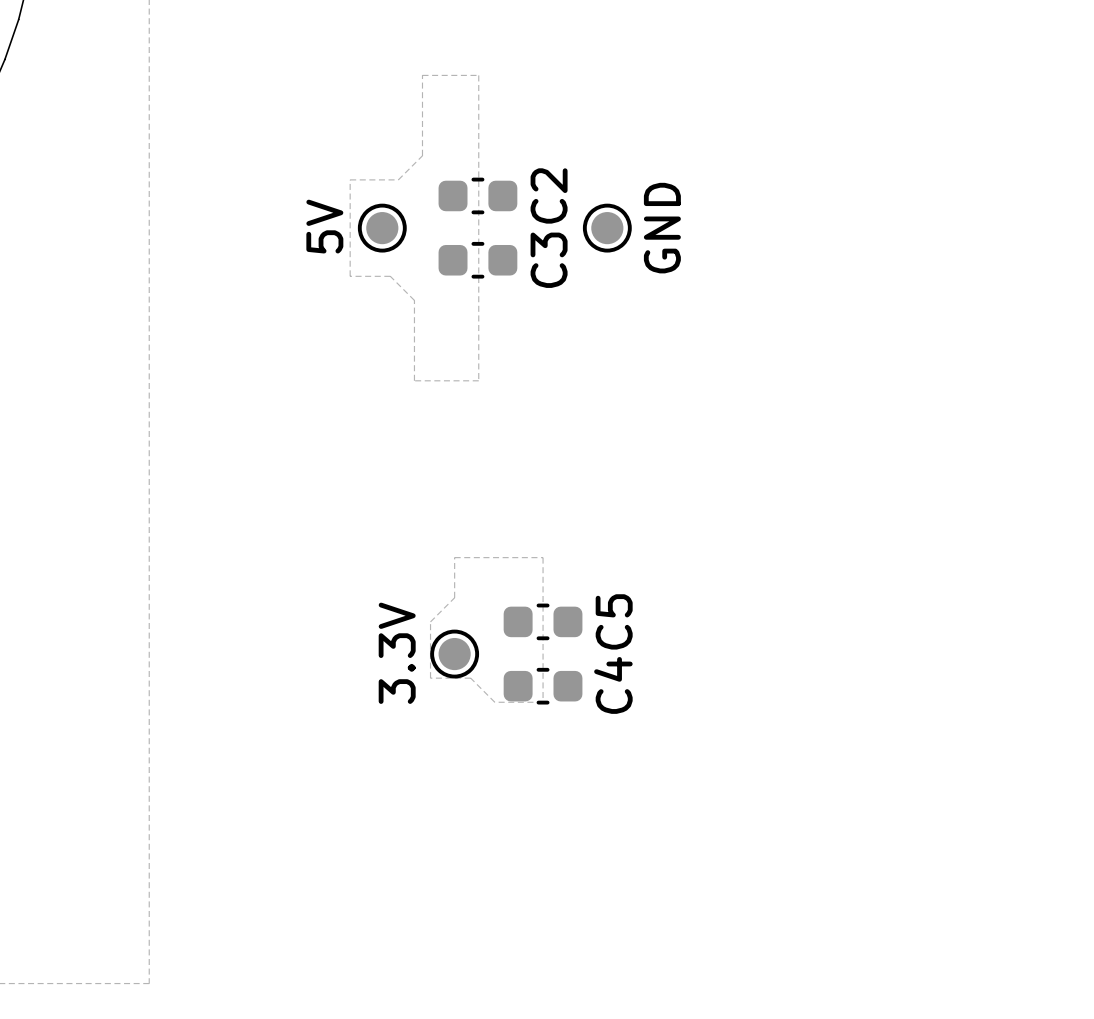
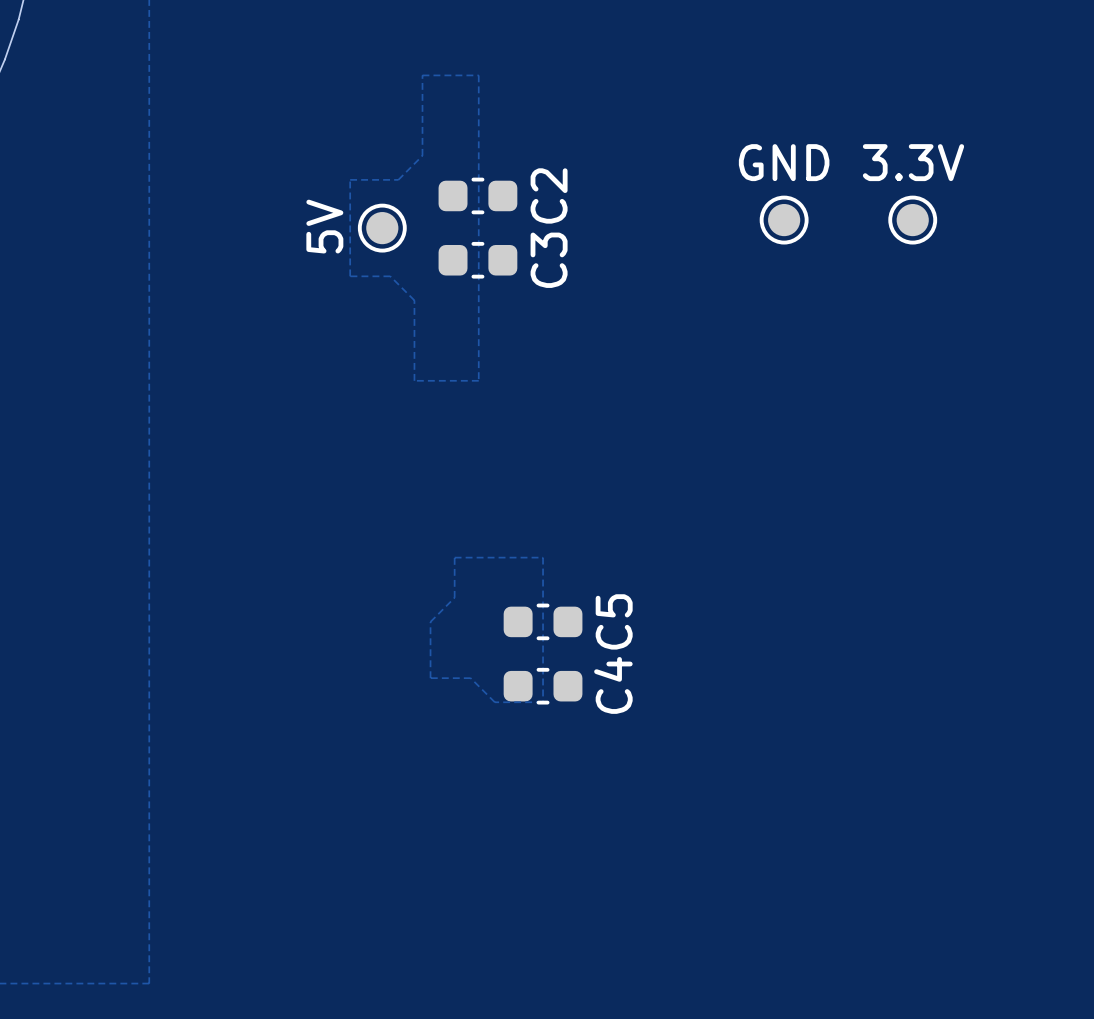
part position: (607, 228) -> (784, 220)
part value rotation: 0° (662, 228) -> 90° clockwise (784, 162)
part value rotation: 0° (397, 653) -> 90° clockwise (913, 162)
part position: (454, 654) -> (912, 220)

